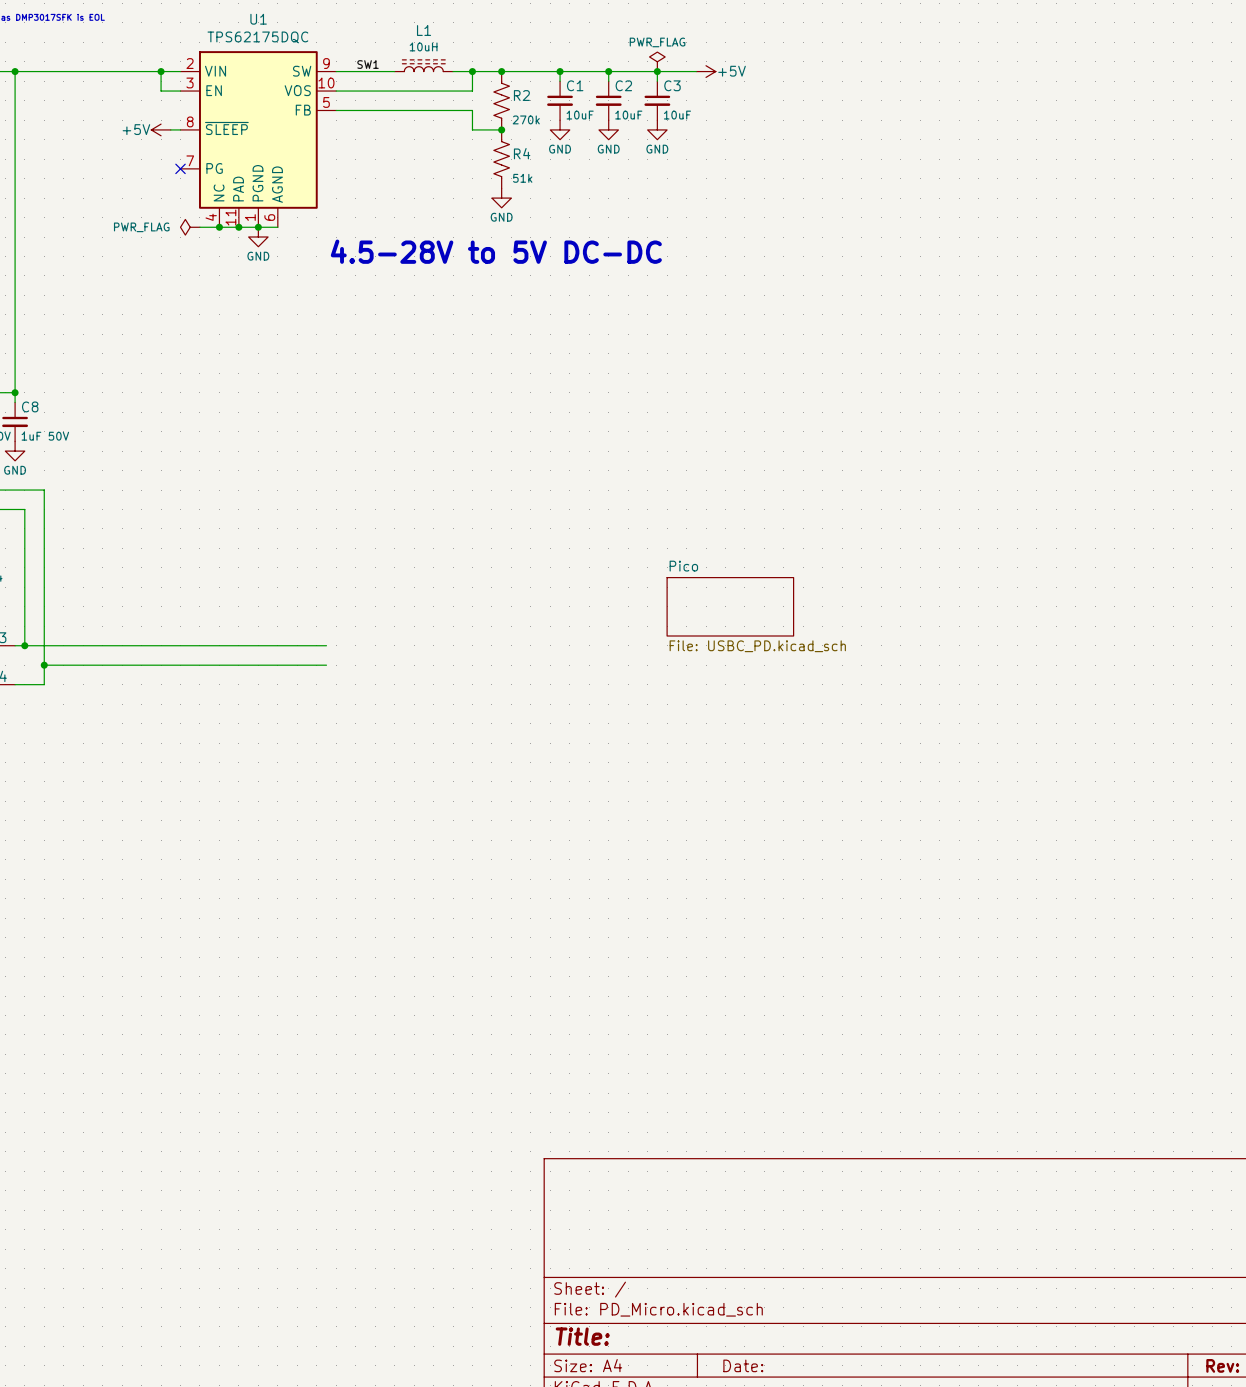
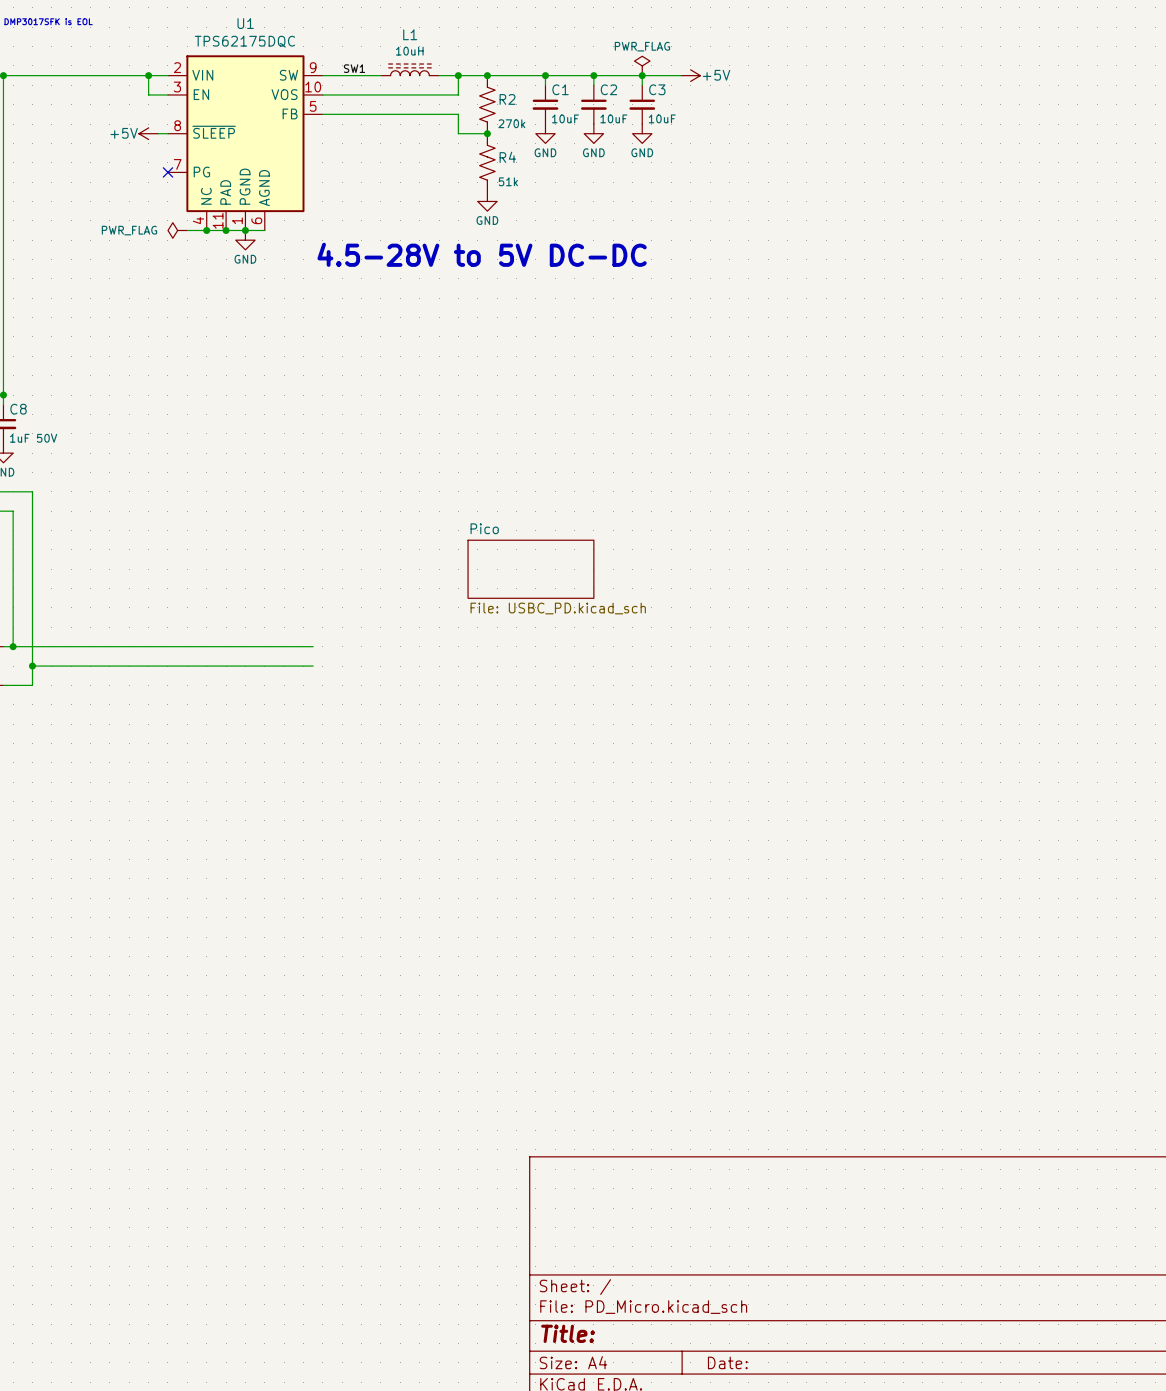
sheet Pico position: (730, 606) -> (530, 569)

